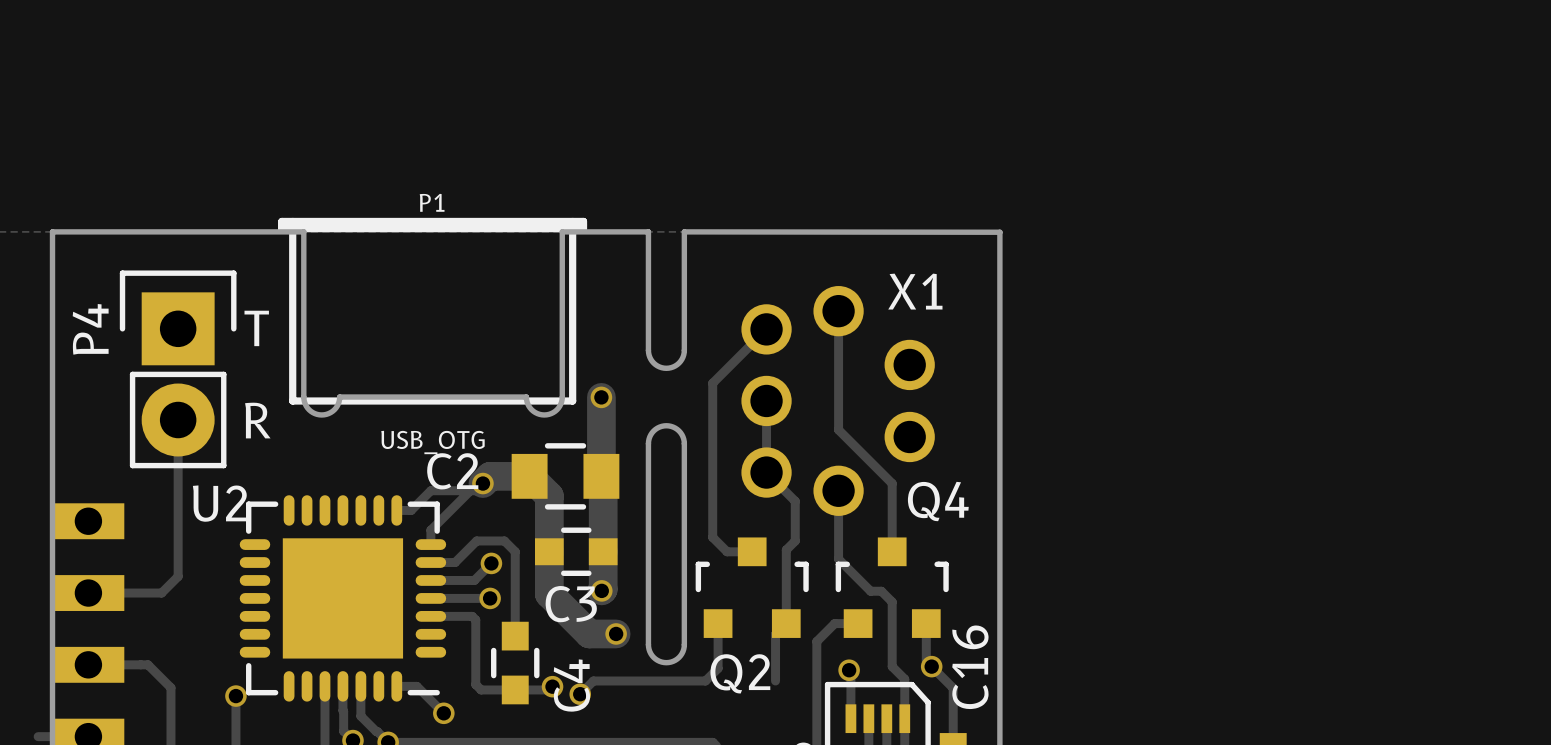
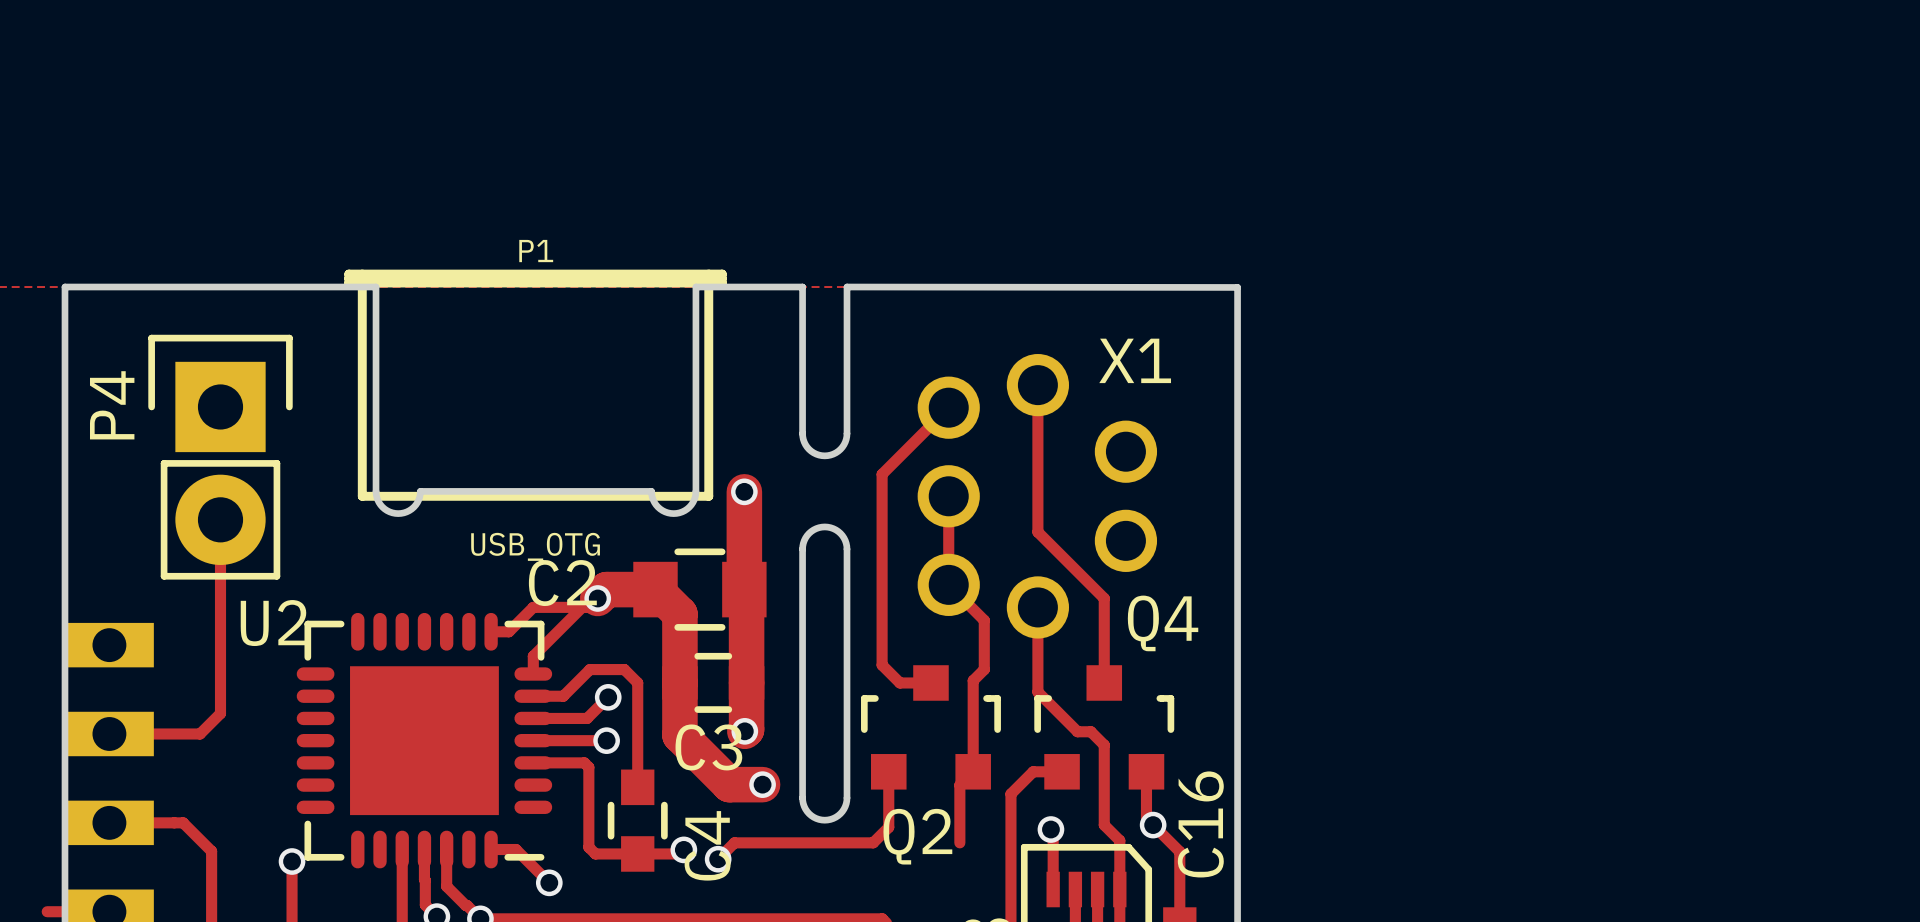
text: T (256, 328) -> none
text: R (257, 420) -> none

